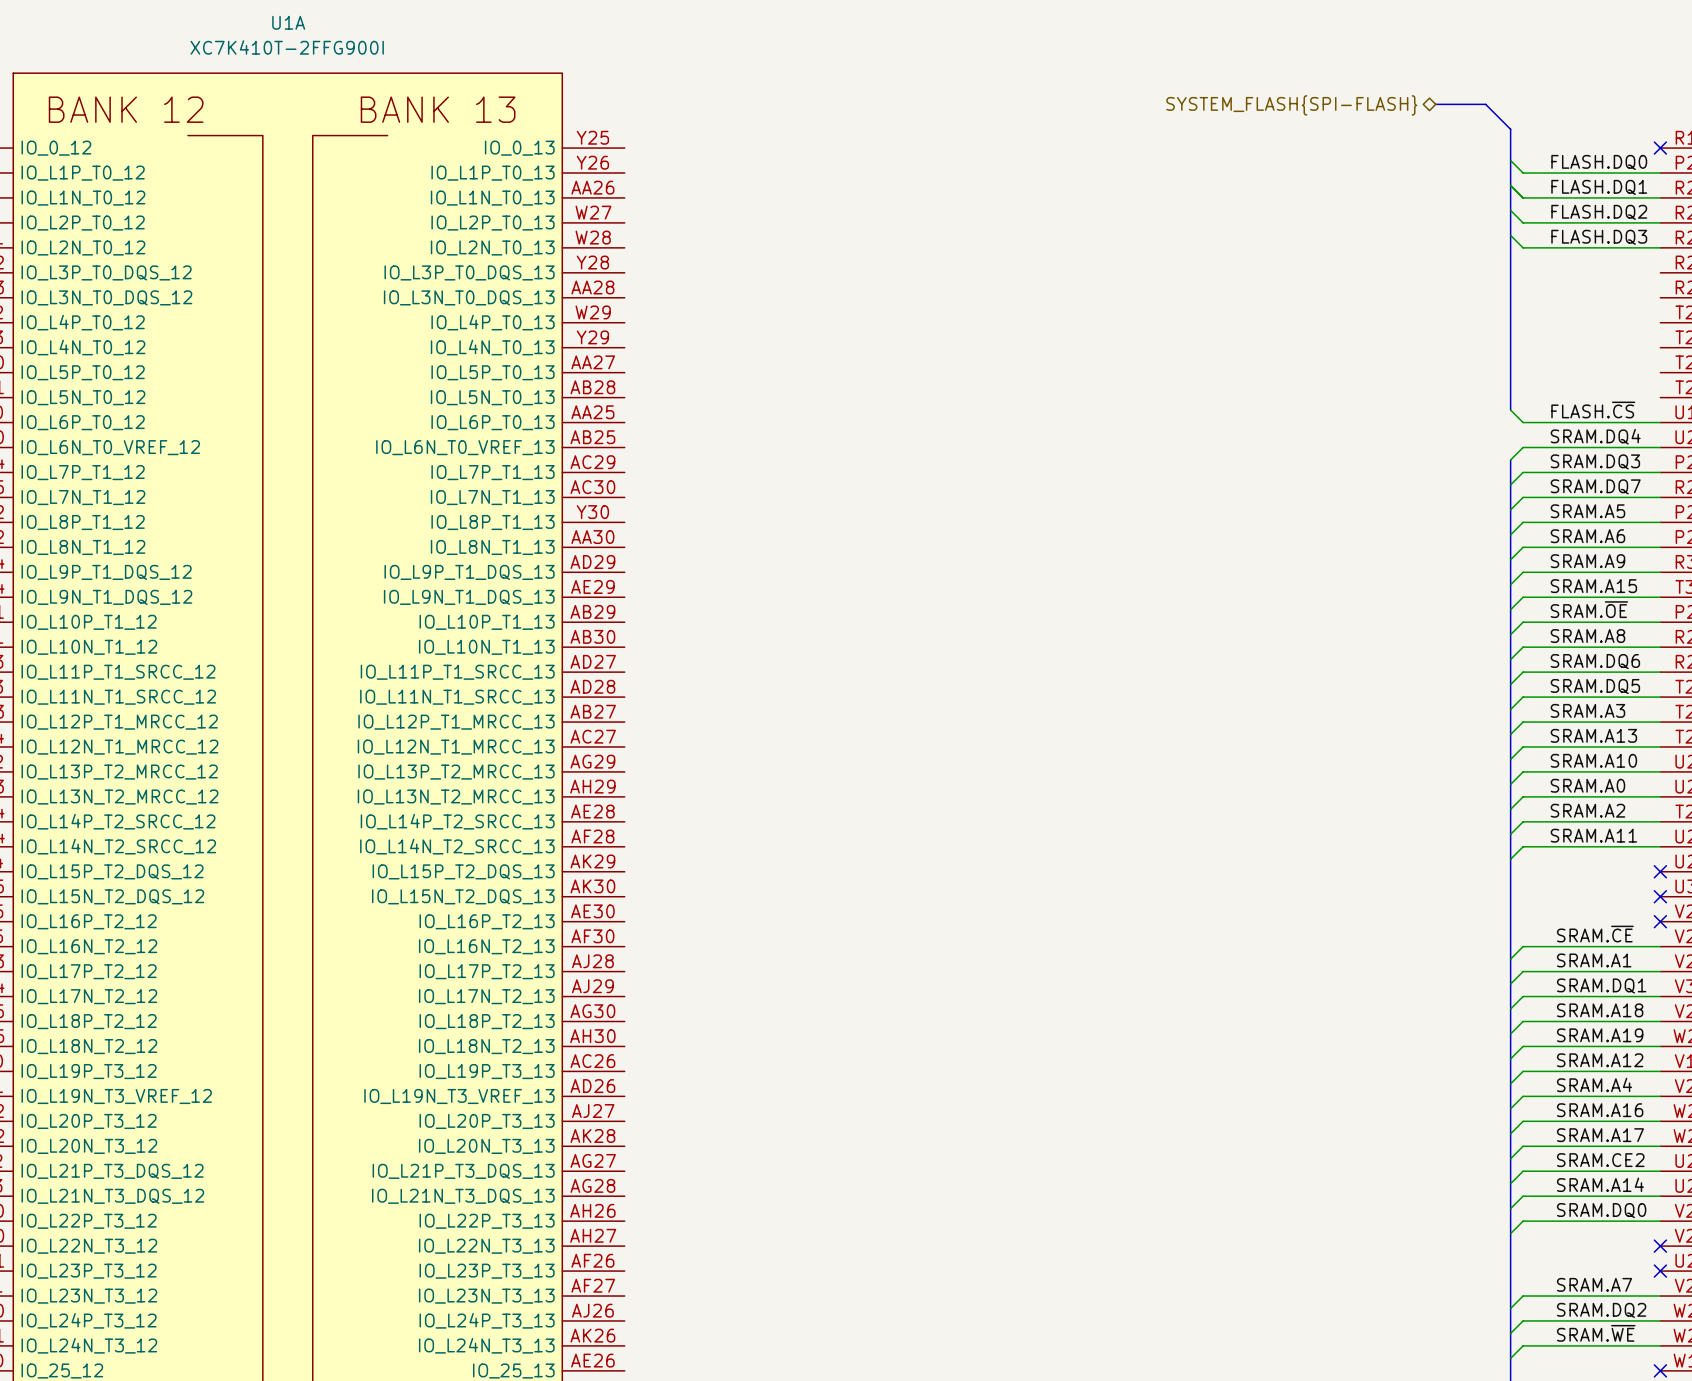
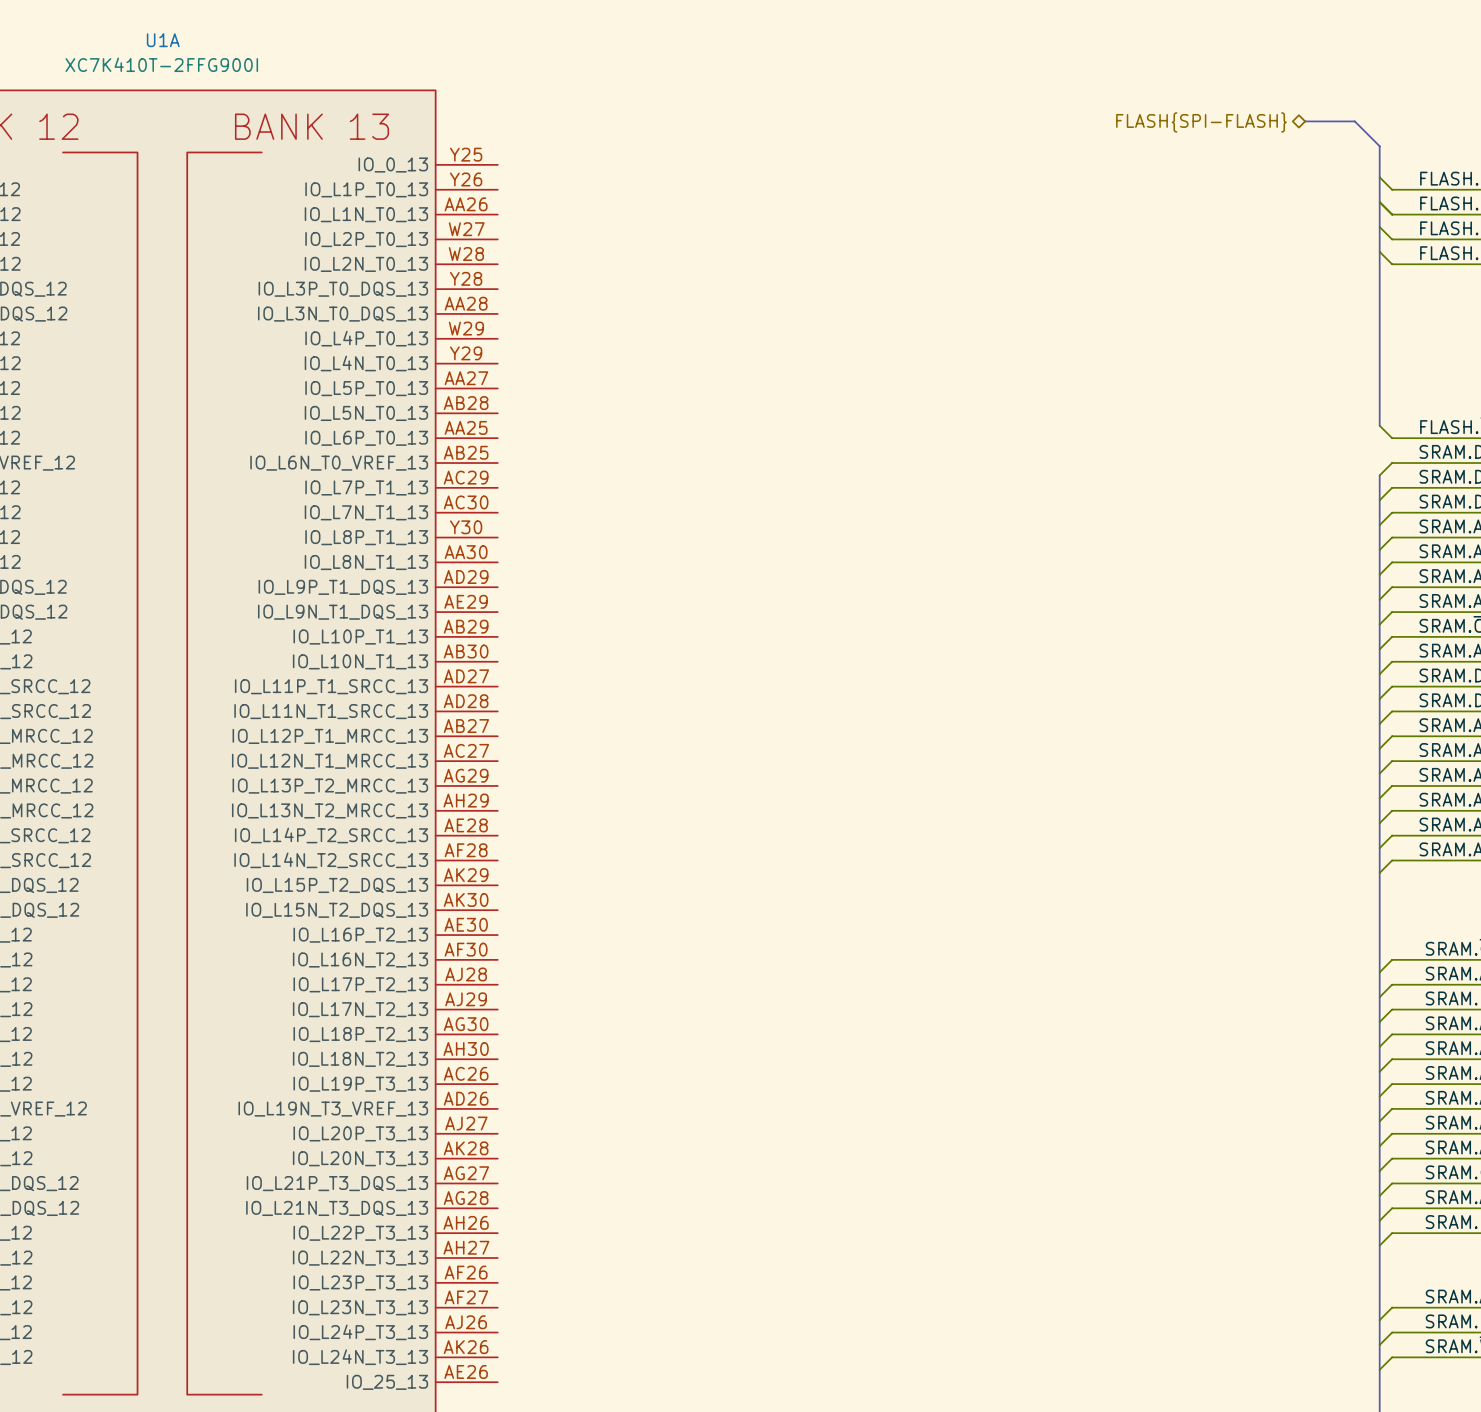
hierarchical label: SYSTEM_FLASH{SPI-FLASH} (1291, 105) -> FLASH{SPI-FLASH} (1201, 122)

